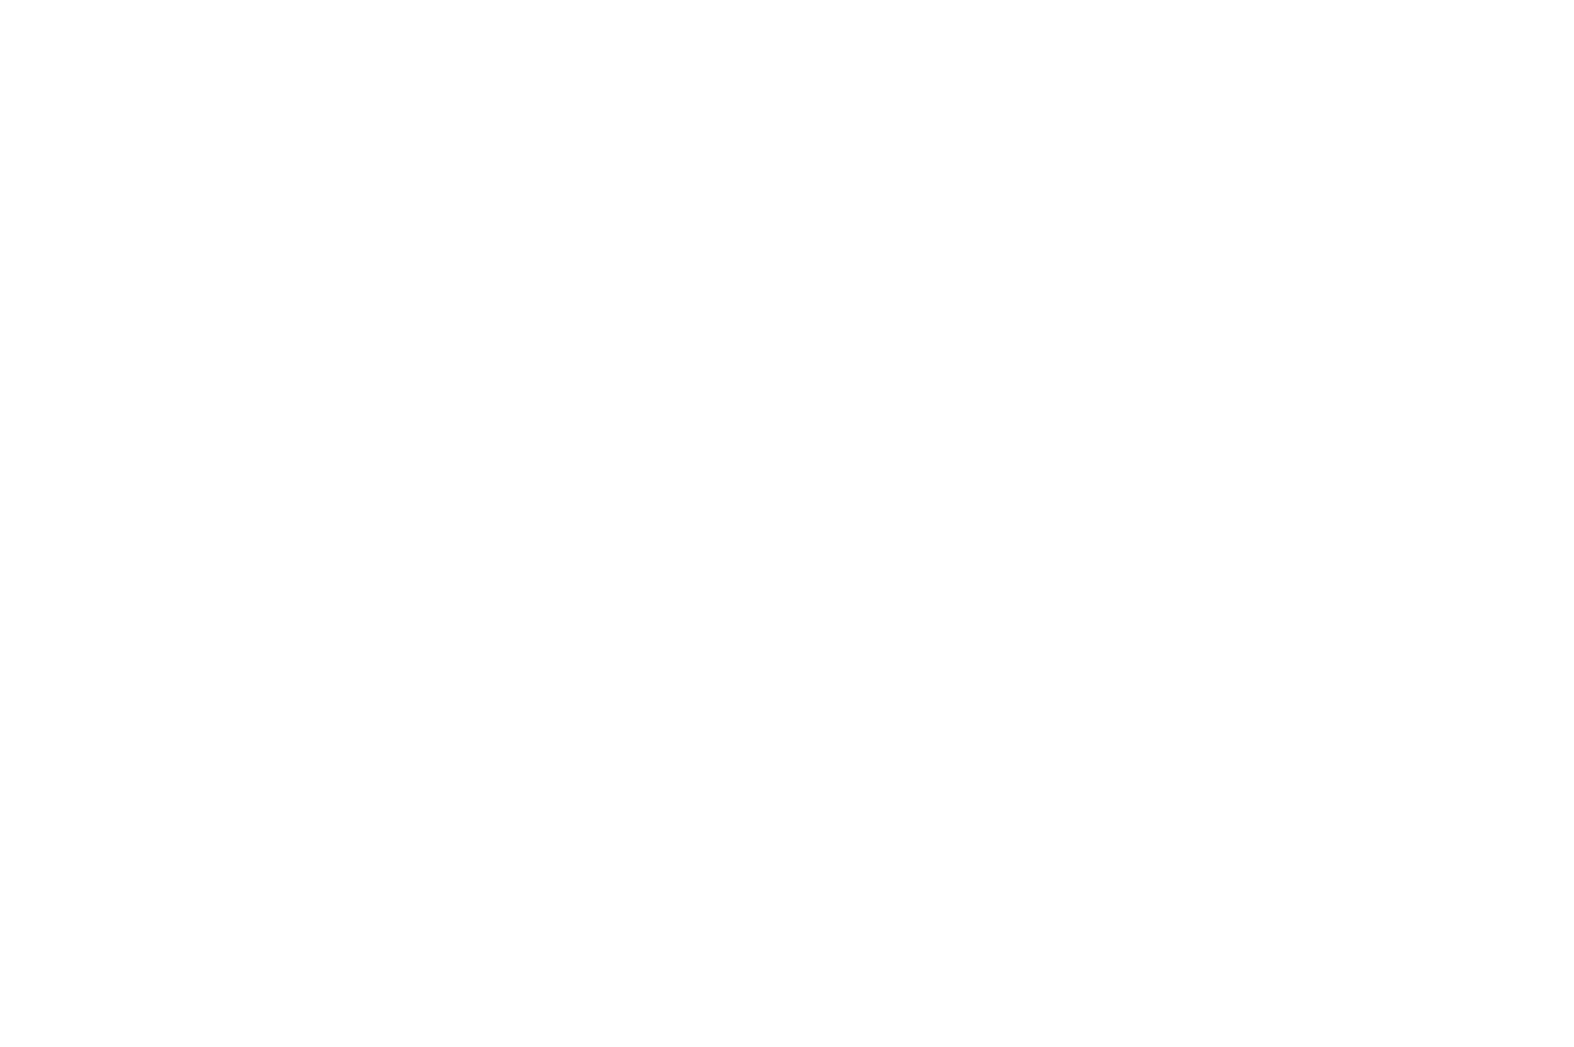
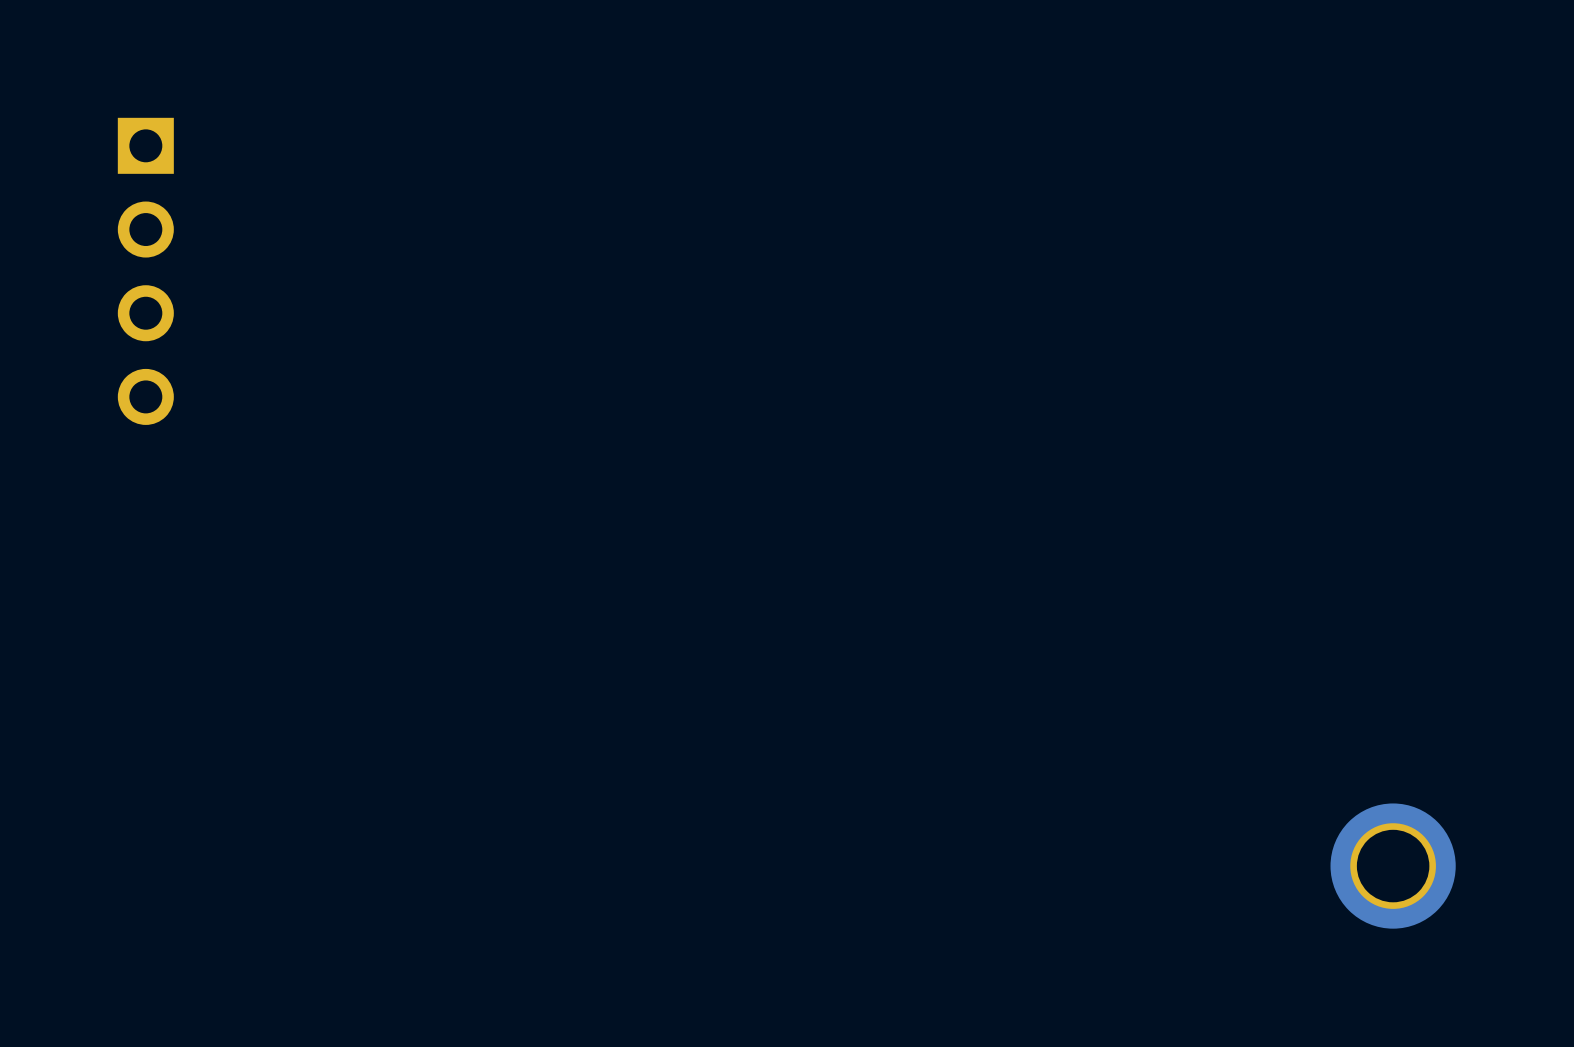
part: none -> (145, 271)
part: none -> (1393, 866)

